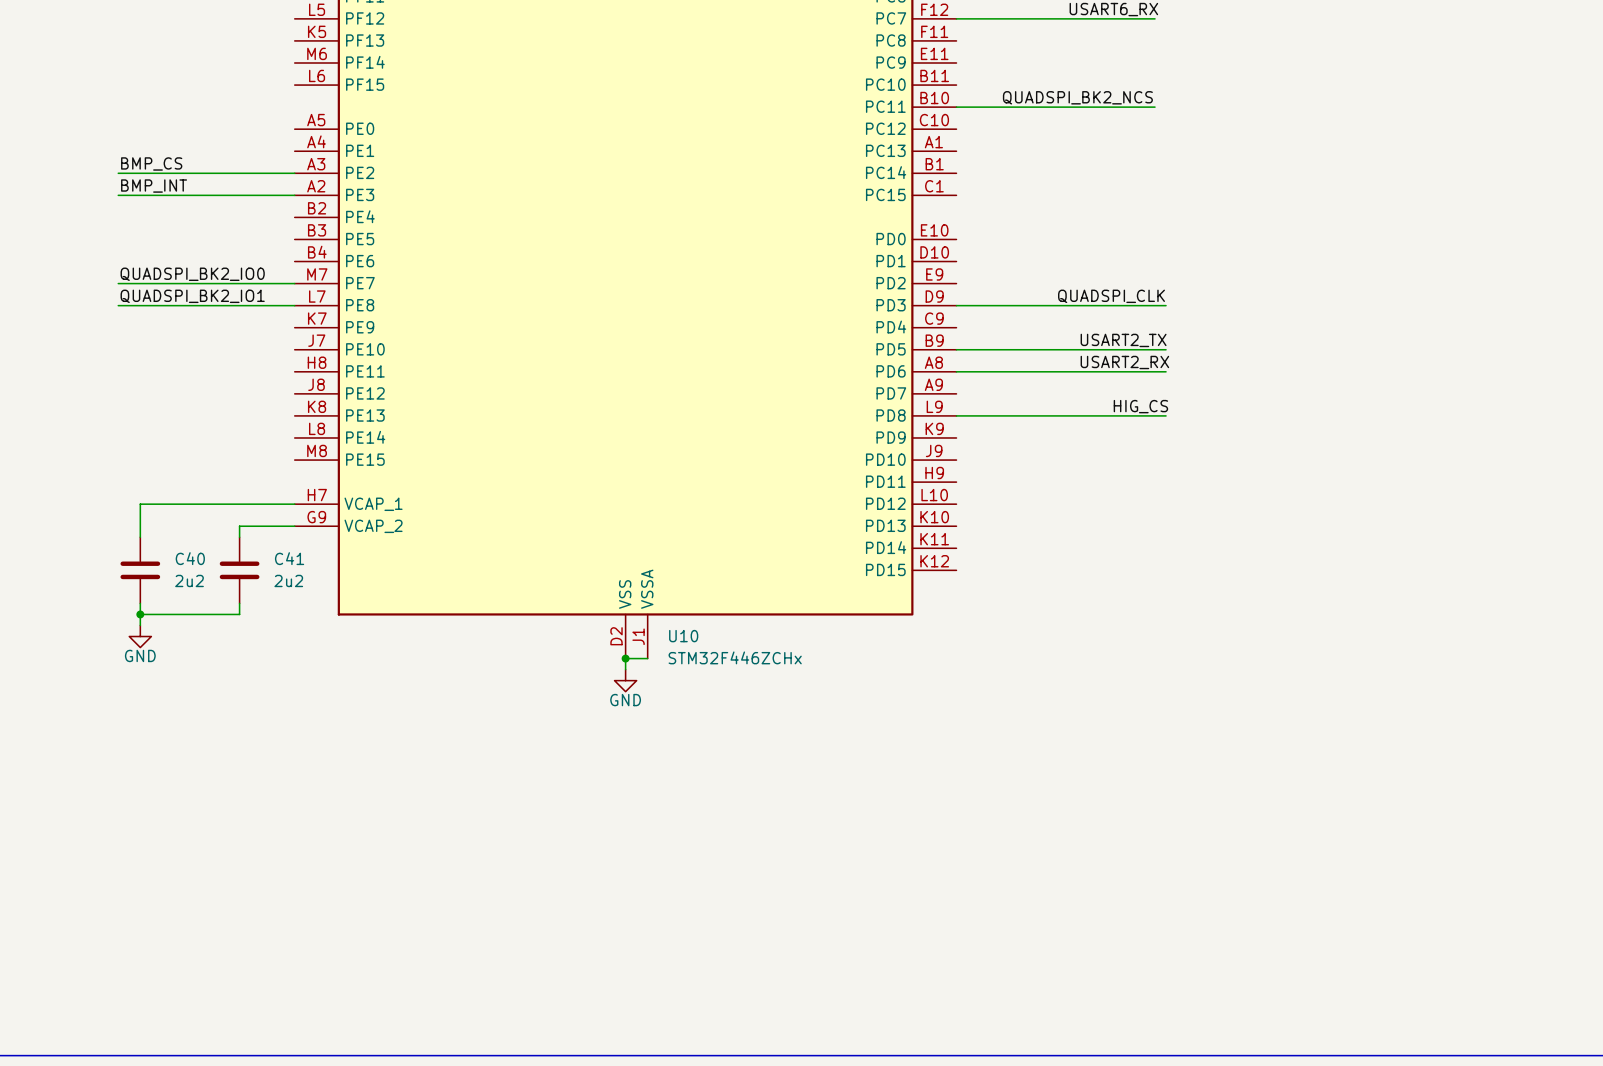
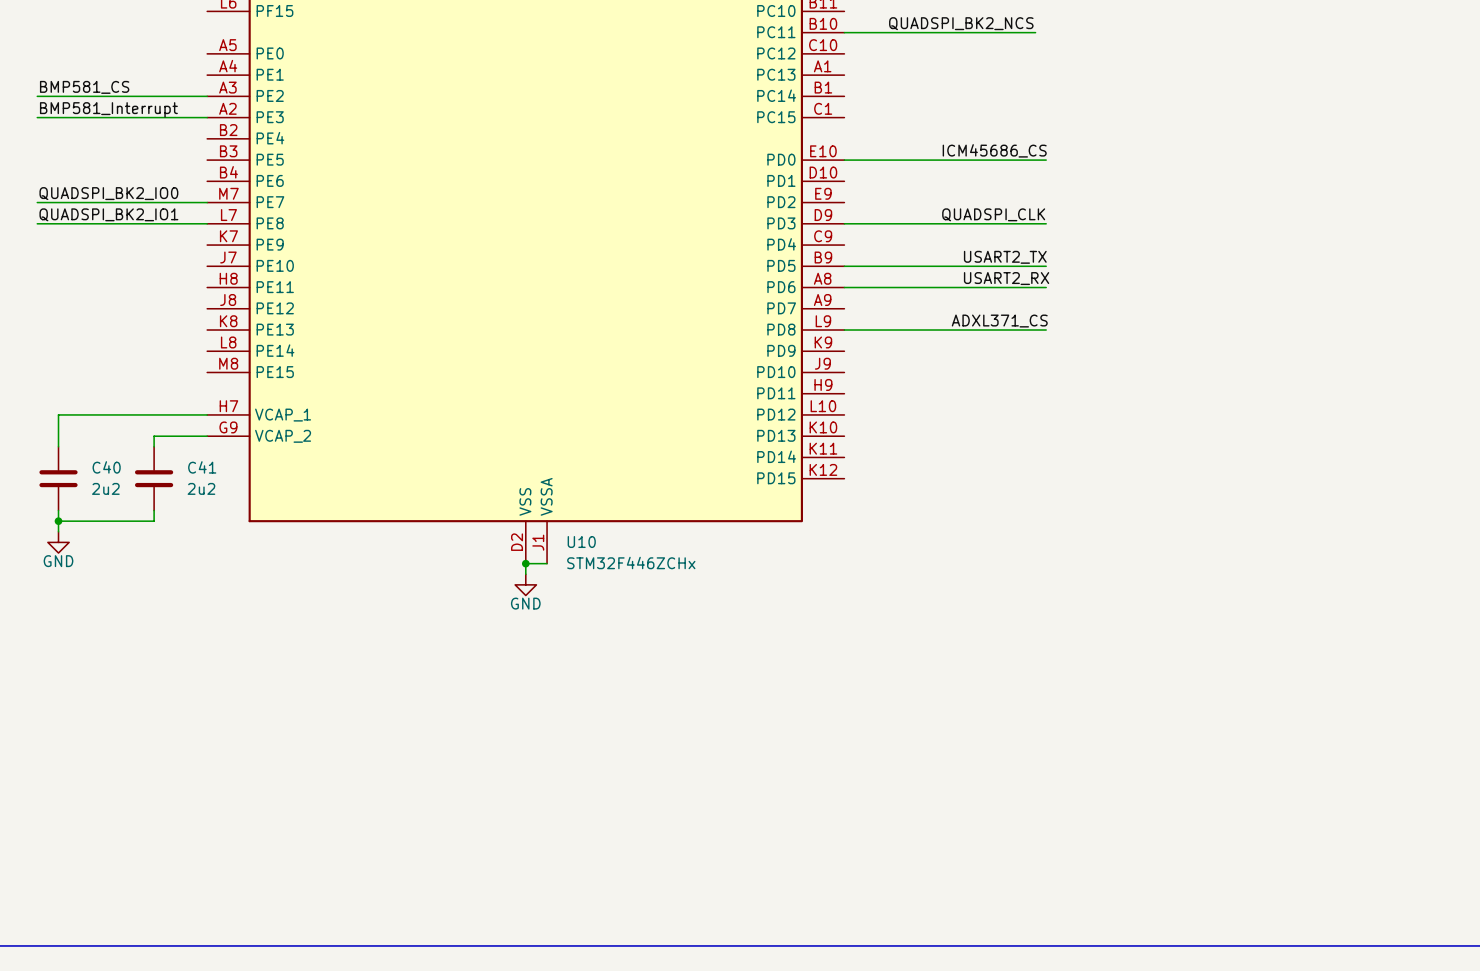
label: BMP_CS (151, 163) -> BMP581_CS (84, 87)
label: BMP_INT (154, 186) -> BMP581_Interrupt (108, 109)
label: none -> ICM45686_CS (994, 150)
wire: none -> (844, 160) (1046, 160)
label: none -> ADXL371_CS (999, 321)
label: HIG_CS (1140, 406) -> none

